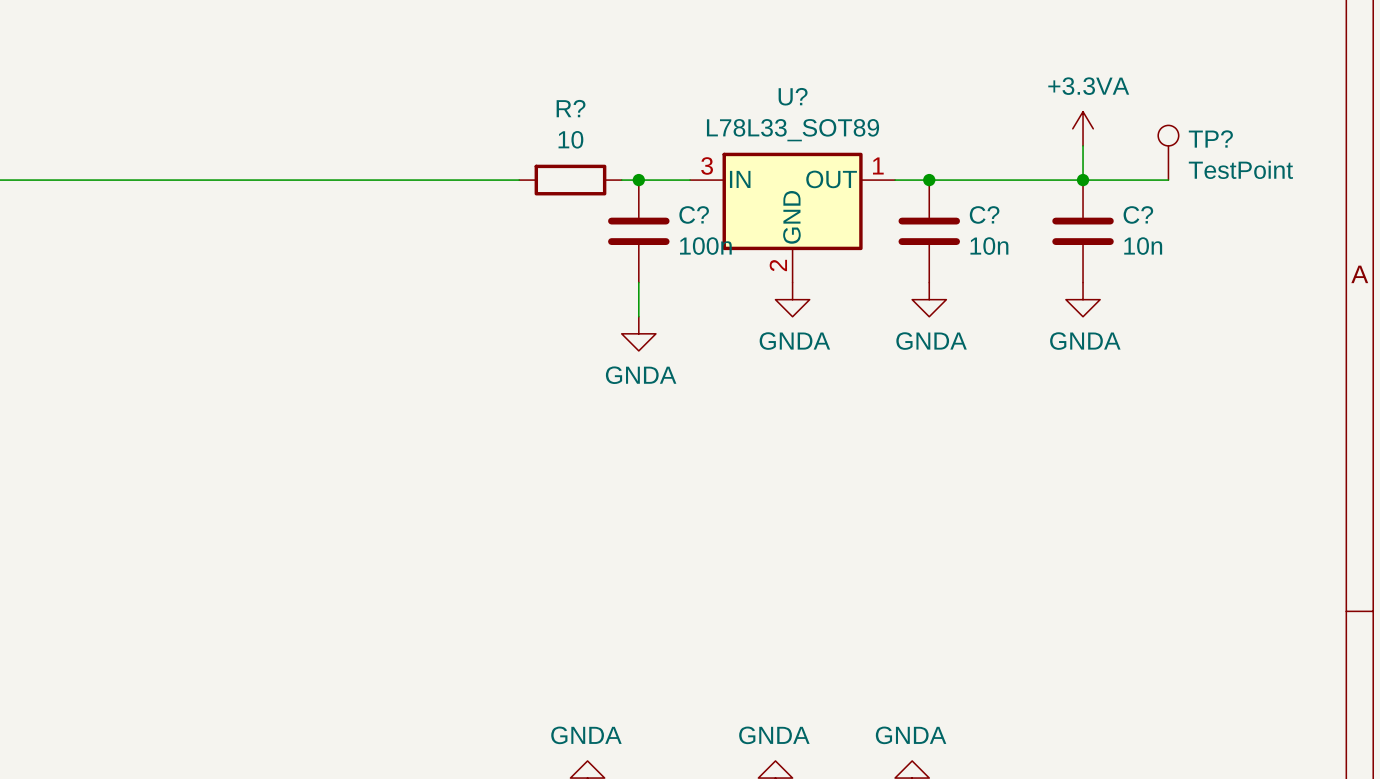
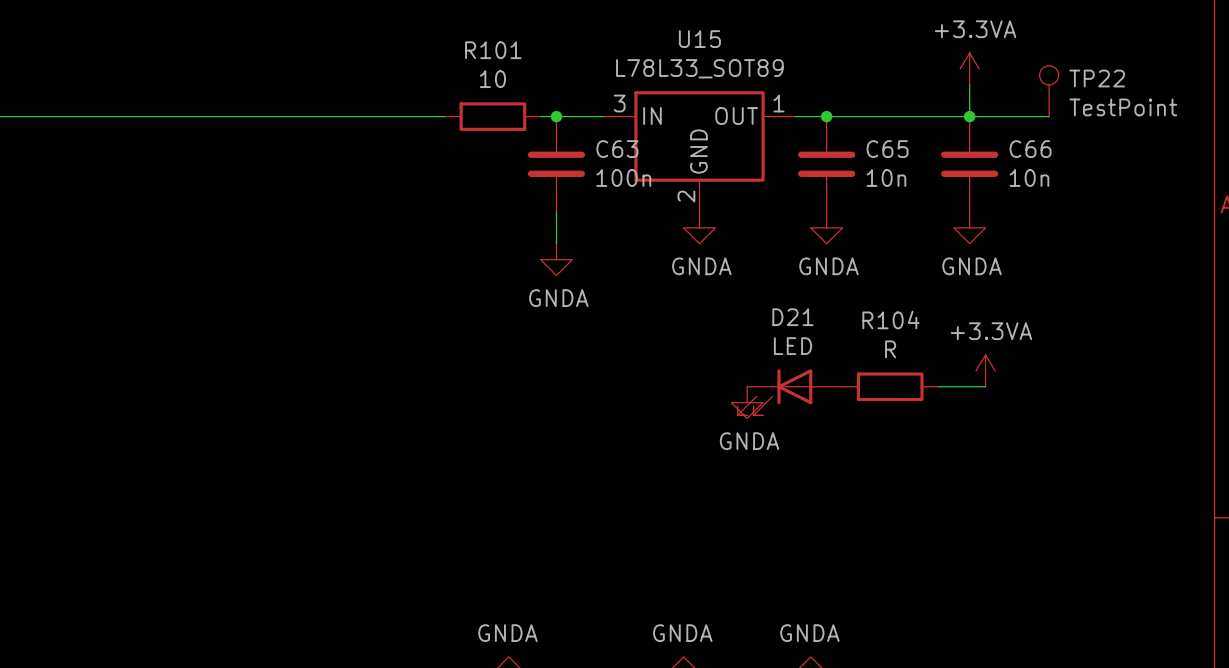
U? name: U? (793, 96) -> U15 (699, 39)
R? name: R? (571, 108) -> R101 (493, 50)
TP? name: TP? (1210, 138) -> TP22 (1097, 78)
C? name: C? (694, 214) -> C63 (617, 149)
C? name: C? (984, 214) -> C65 (887, 149)
C? name: C? (1138, 214) -> C66 (1030, 149)
power symbol: none -> +3.3VA (985, 370)
R104: none -> R (890, 386)
wire: none -> (937, 386) (985, 386)
D21: none -> LED (790, 392)
power symbol: none -> GNDA (747, 402)

